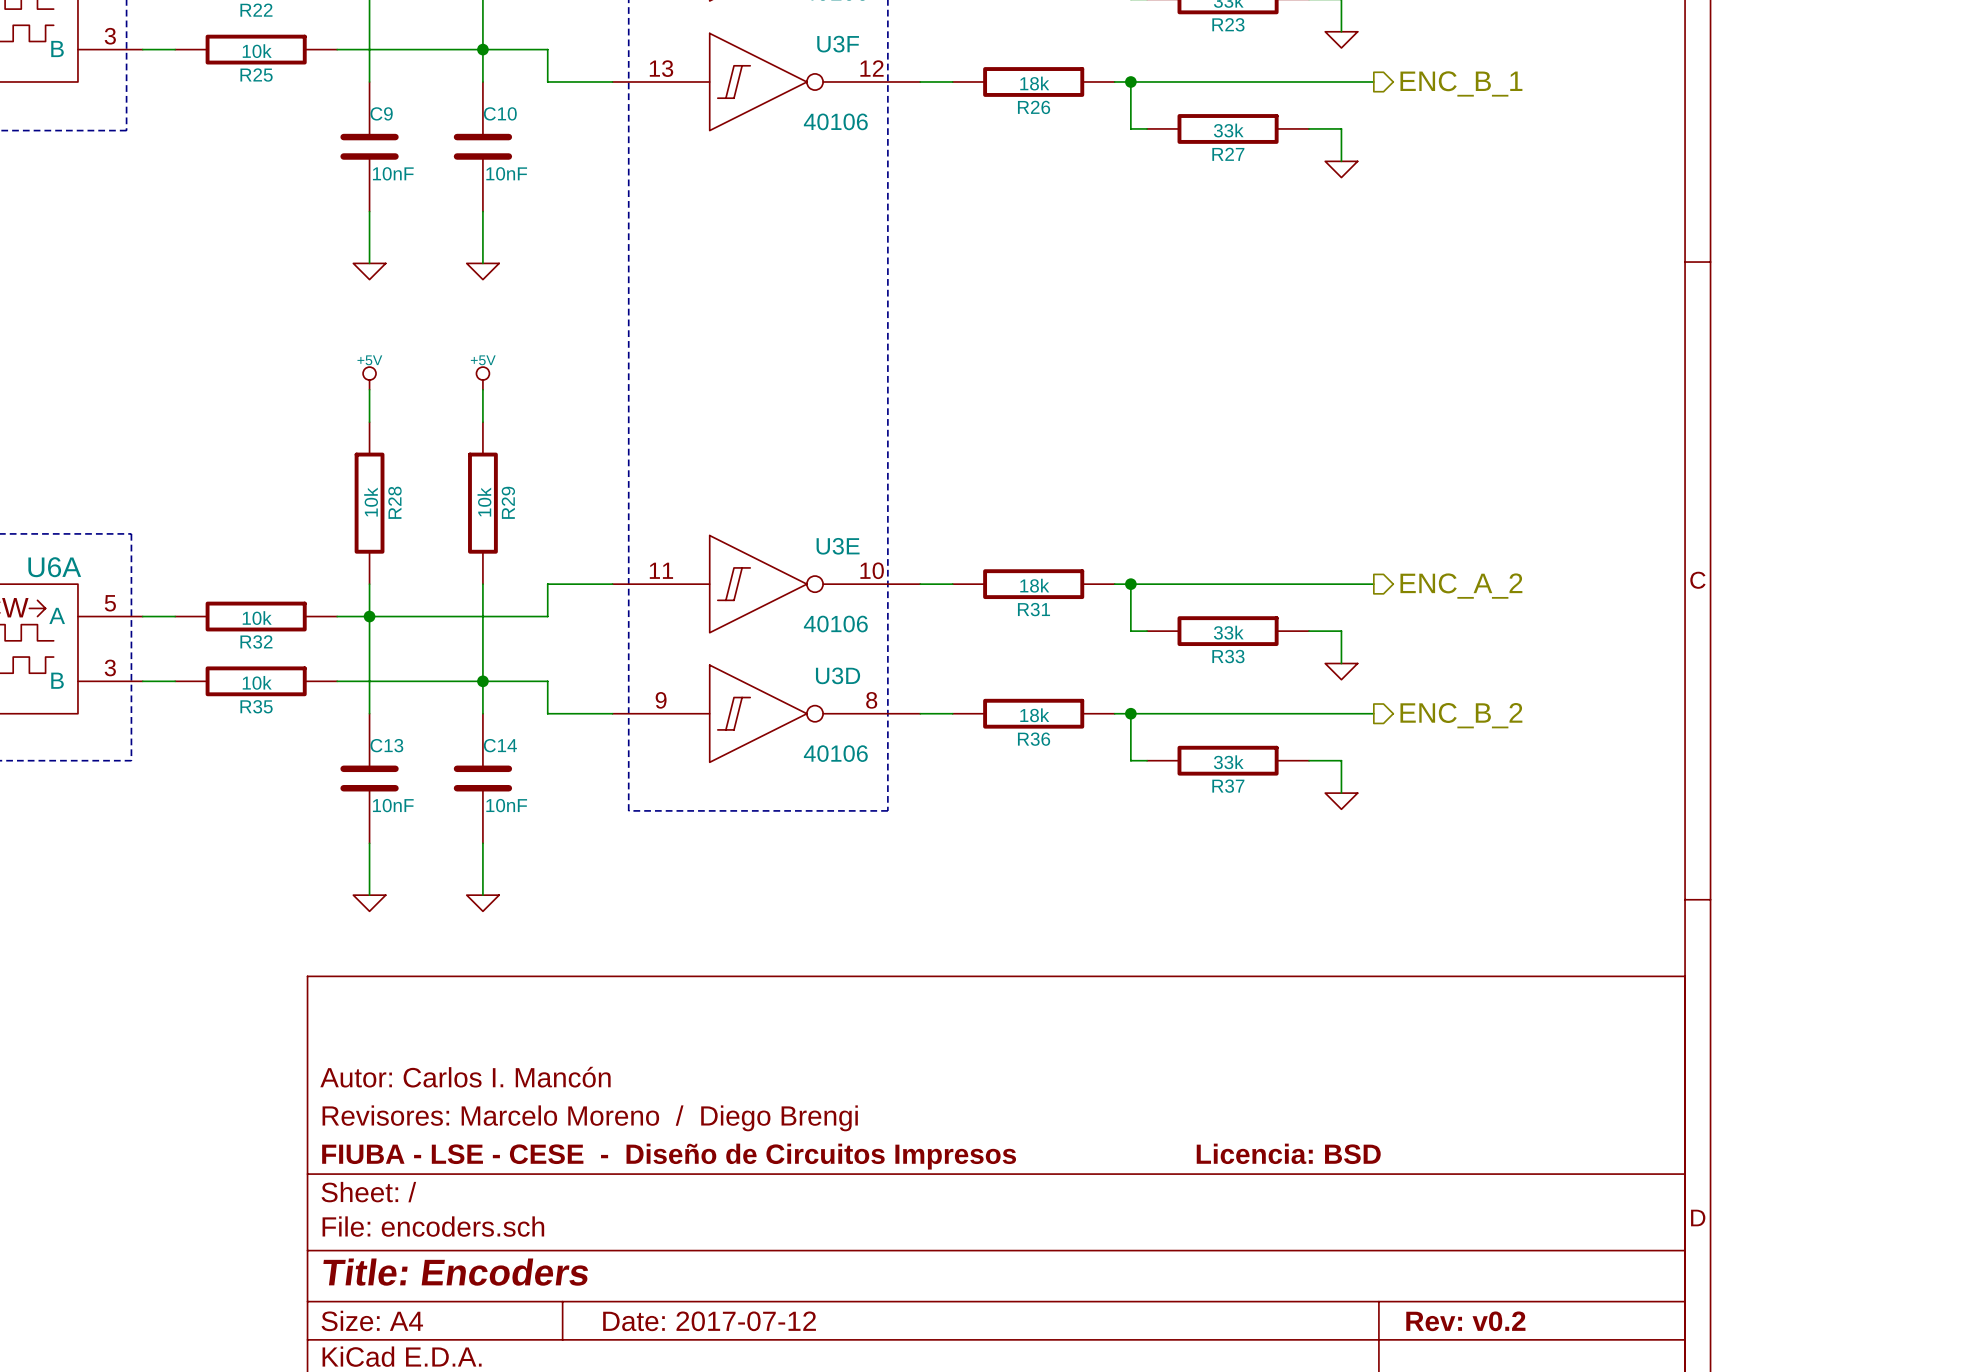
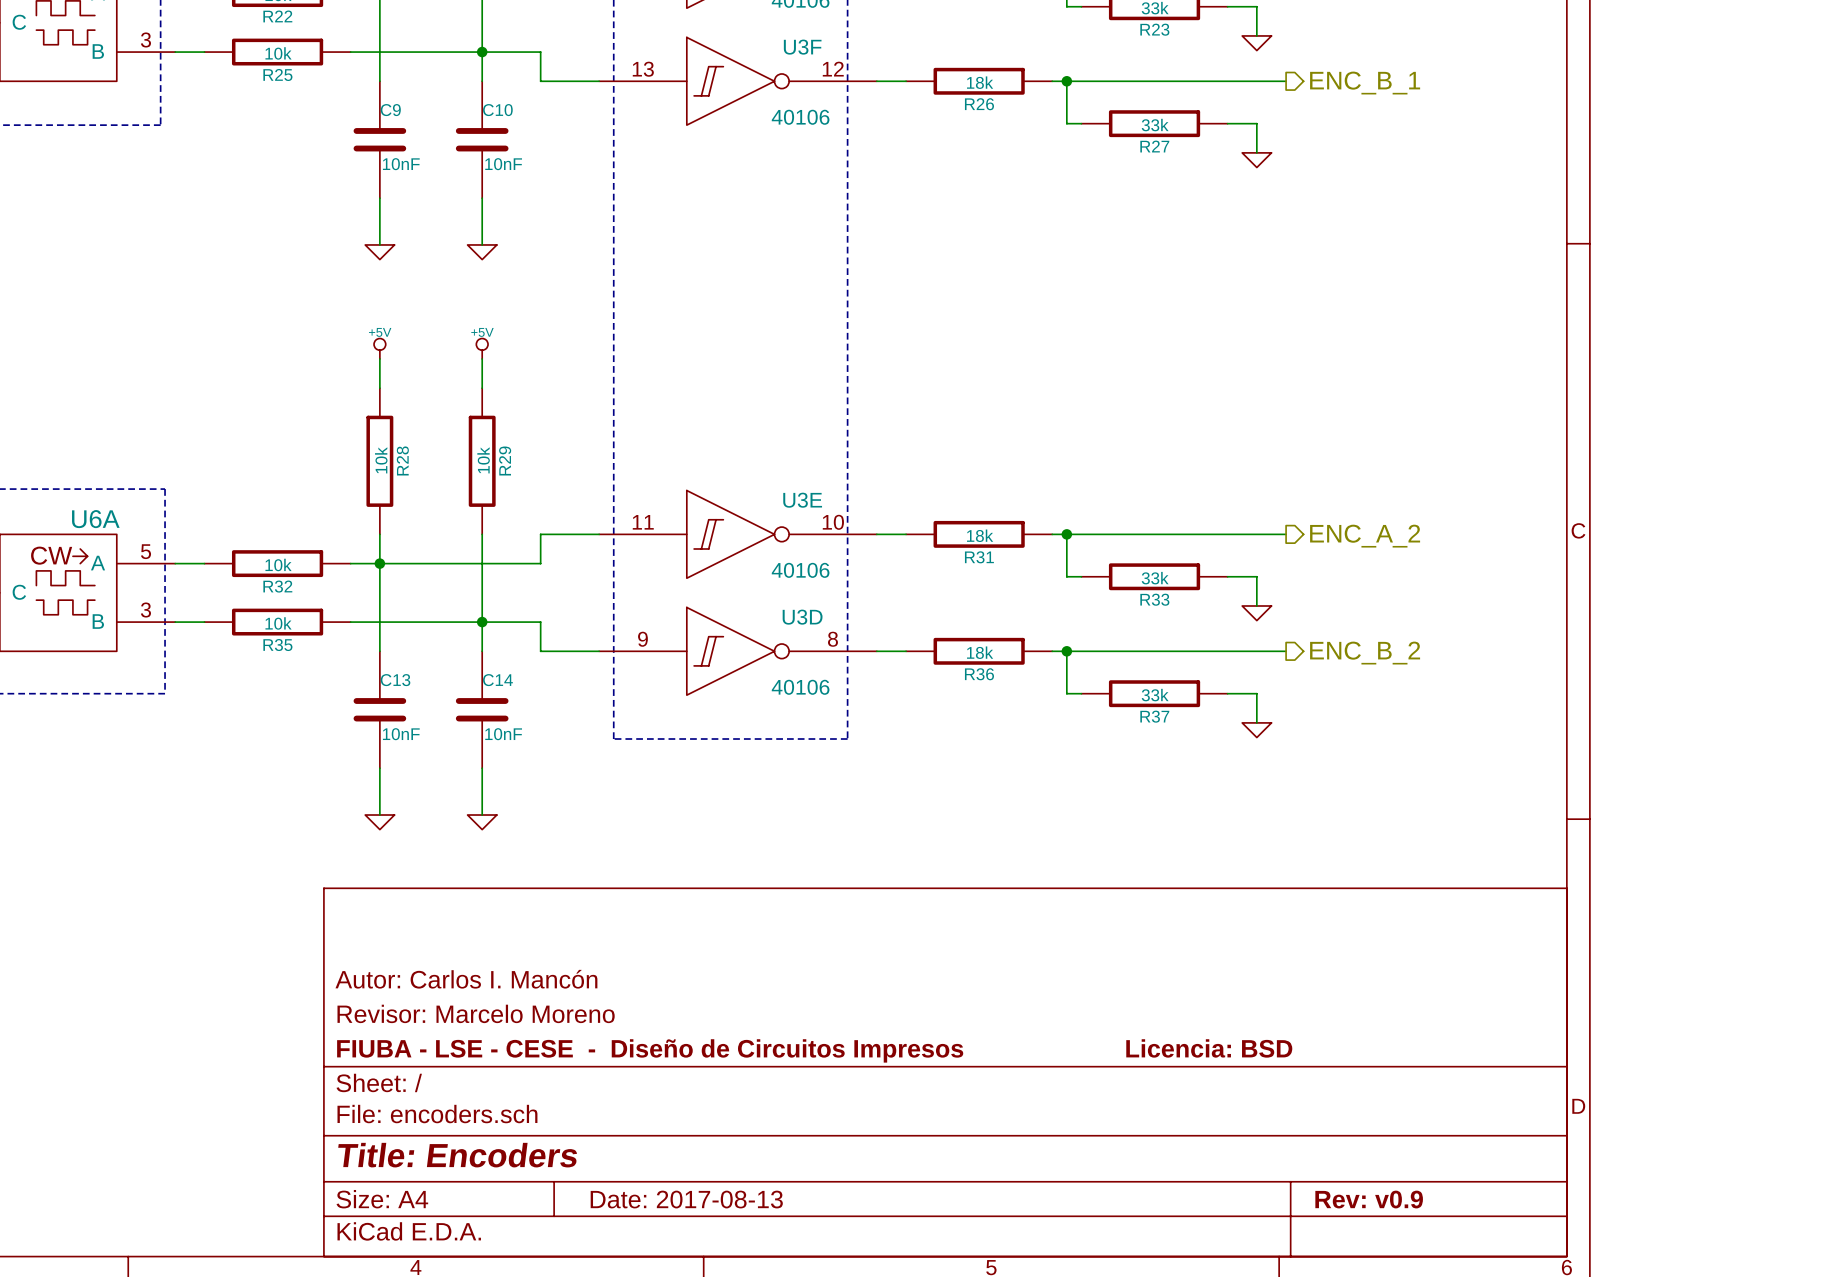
title block: Revisores: Marcelo Moreno / Diego Brengi (590, 1118) -> Revisor: Marcelo Moreno (476, 1013)
title block: Date: 2017-07-12 (709, 1321) -> Date: 2017-08-13 (686, 1199)
title block: Rev: v0.2 (1465, 1321) -> Rev: v0.9 (1369, 1199)

